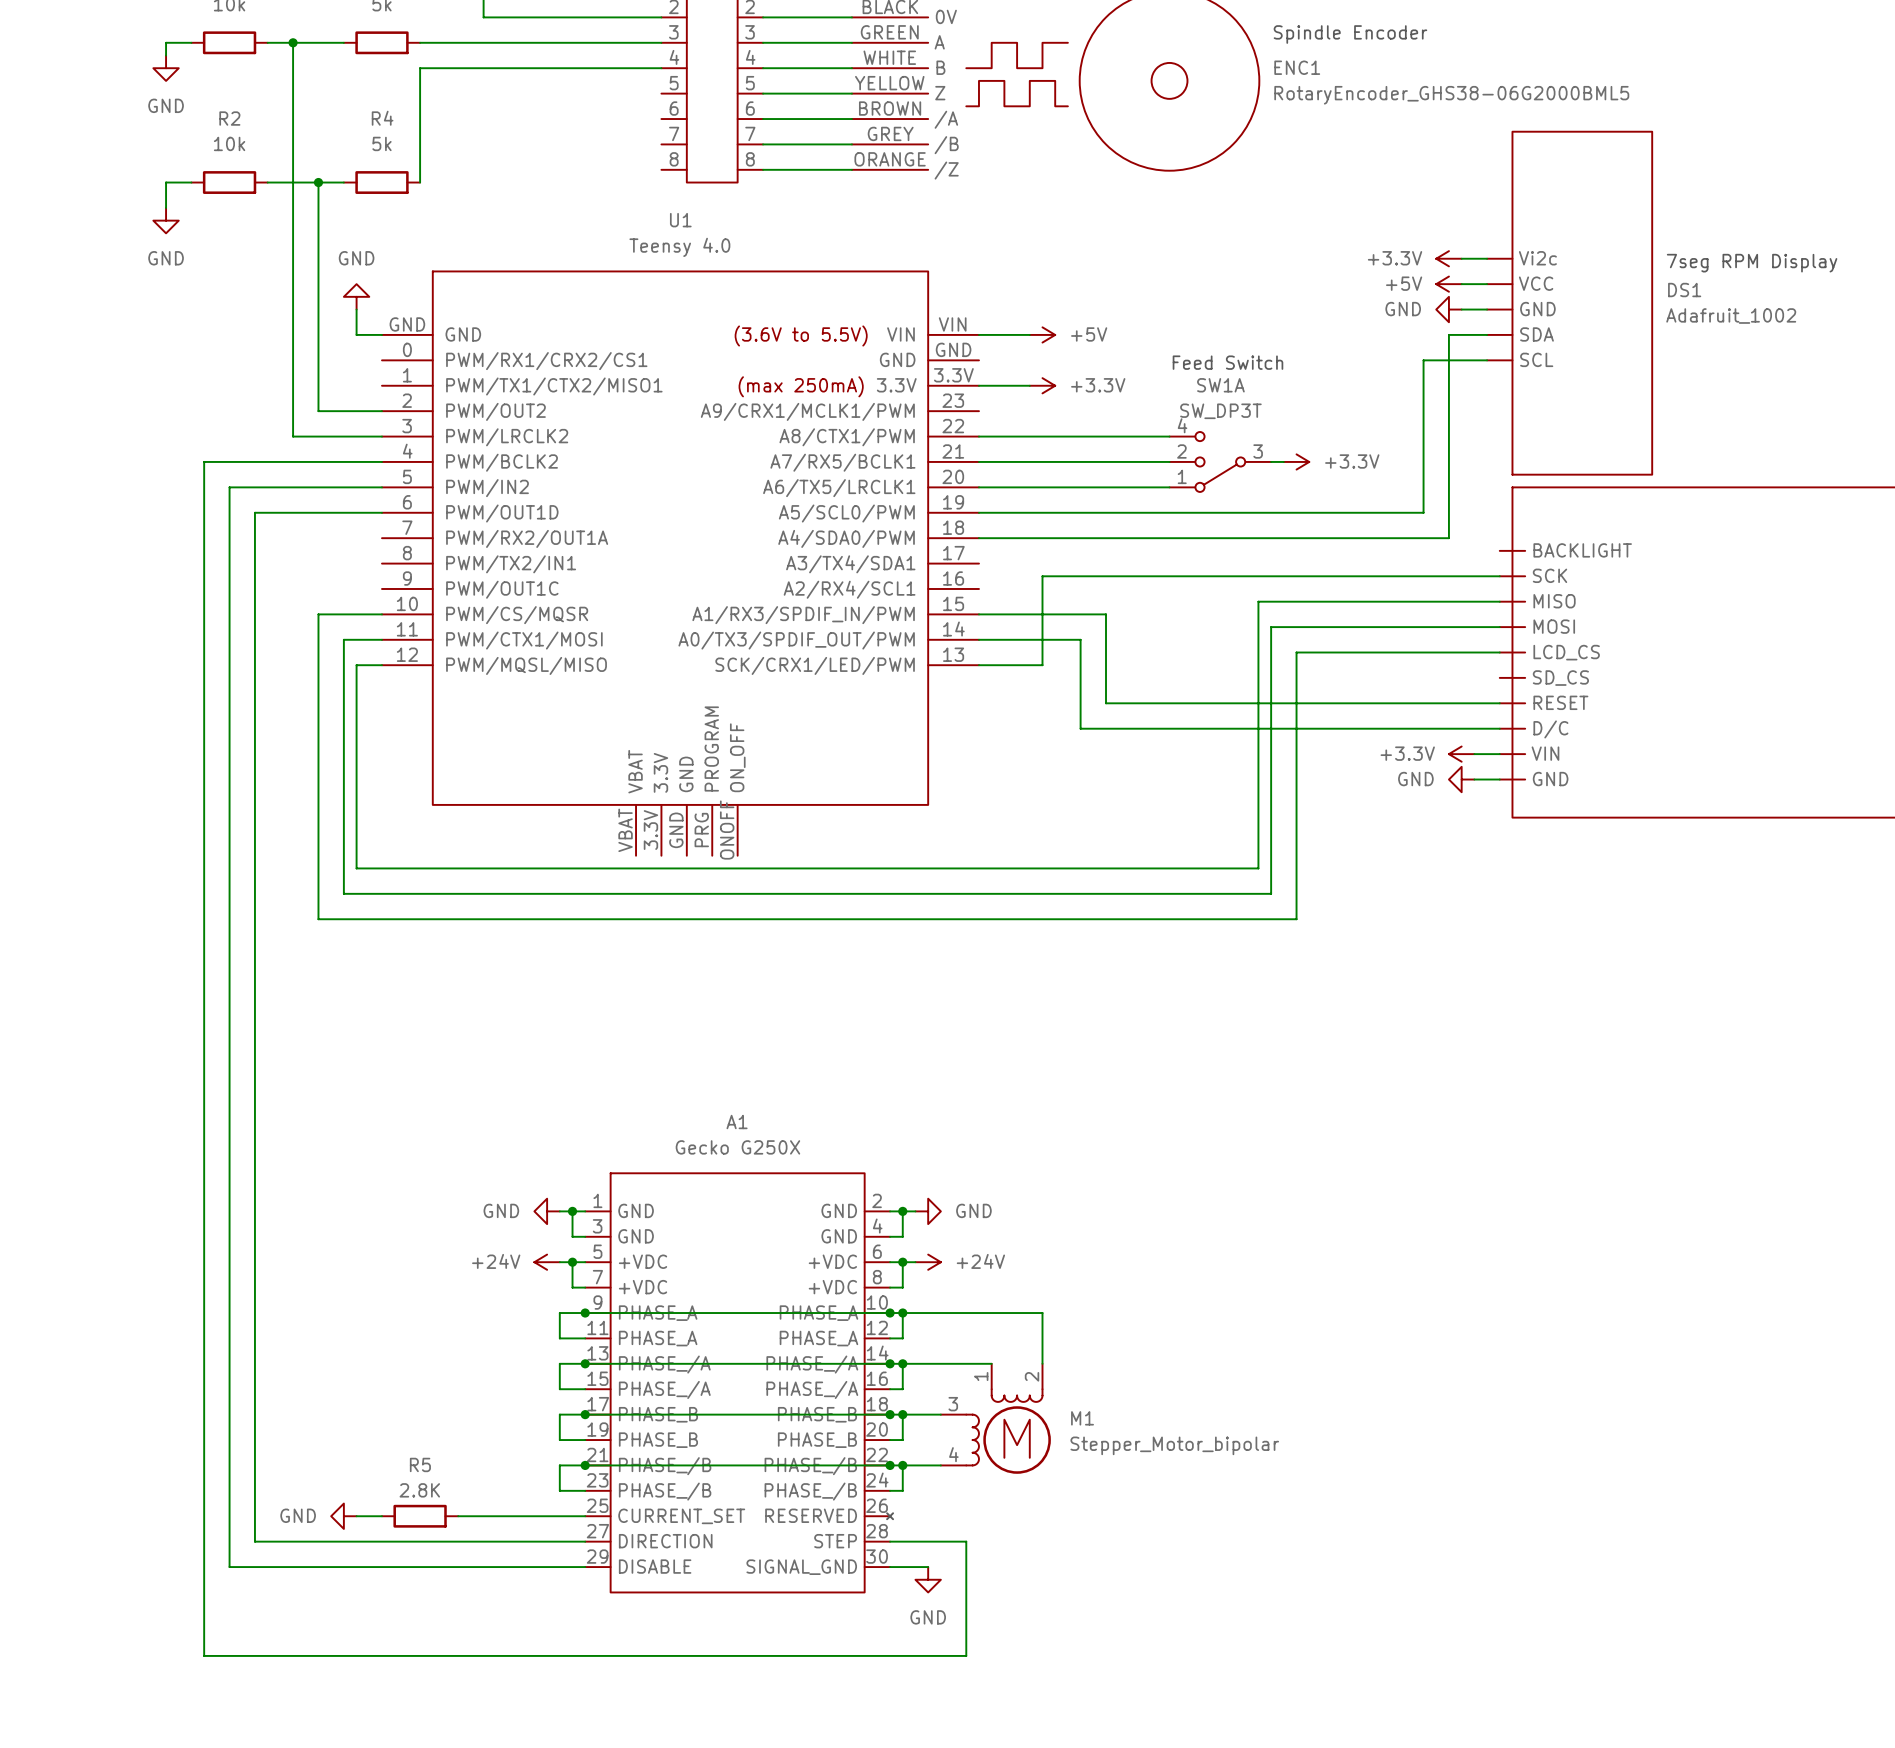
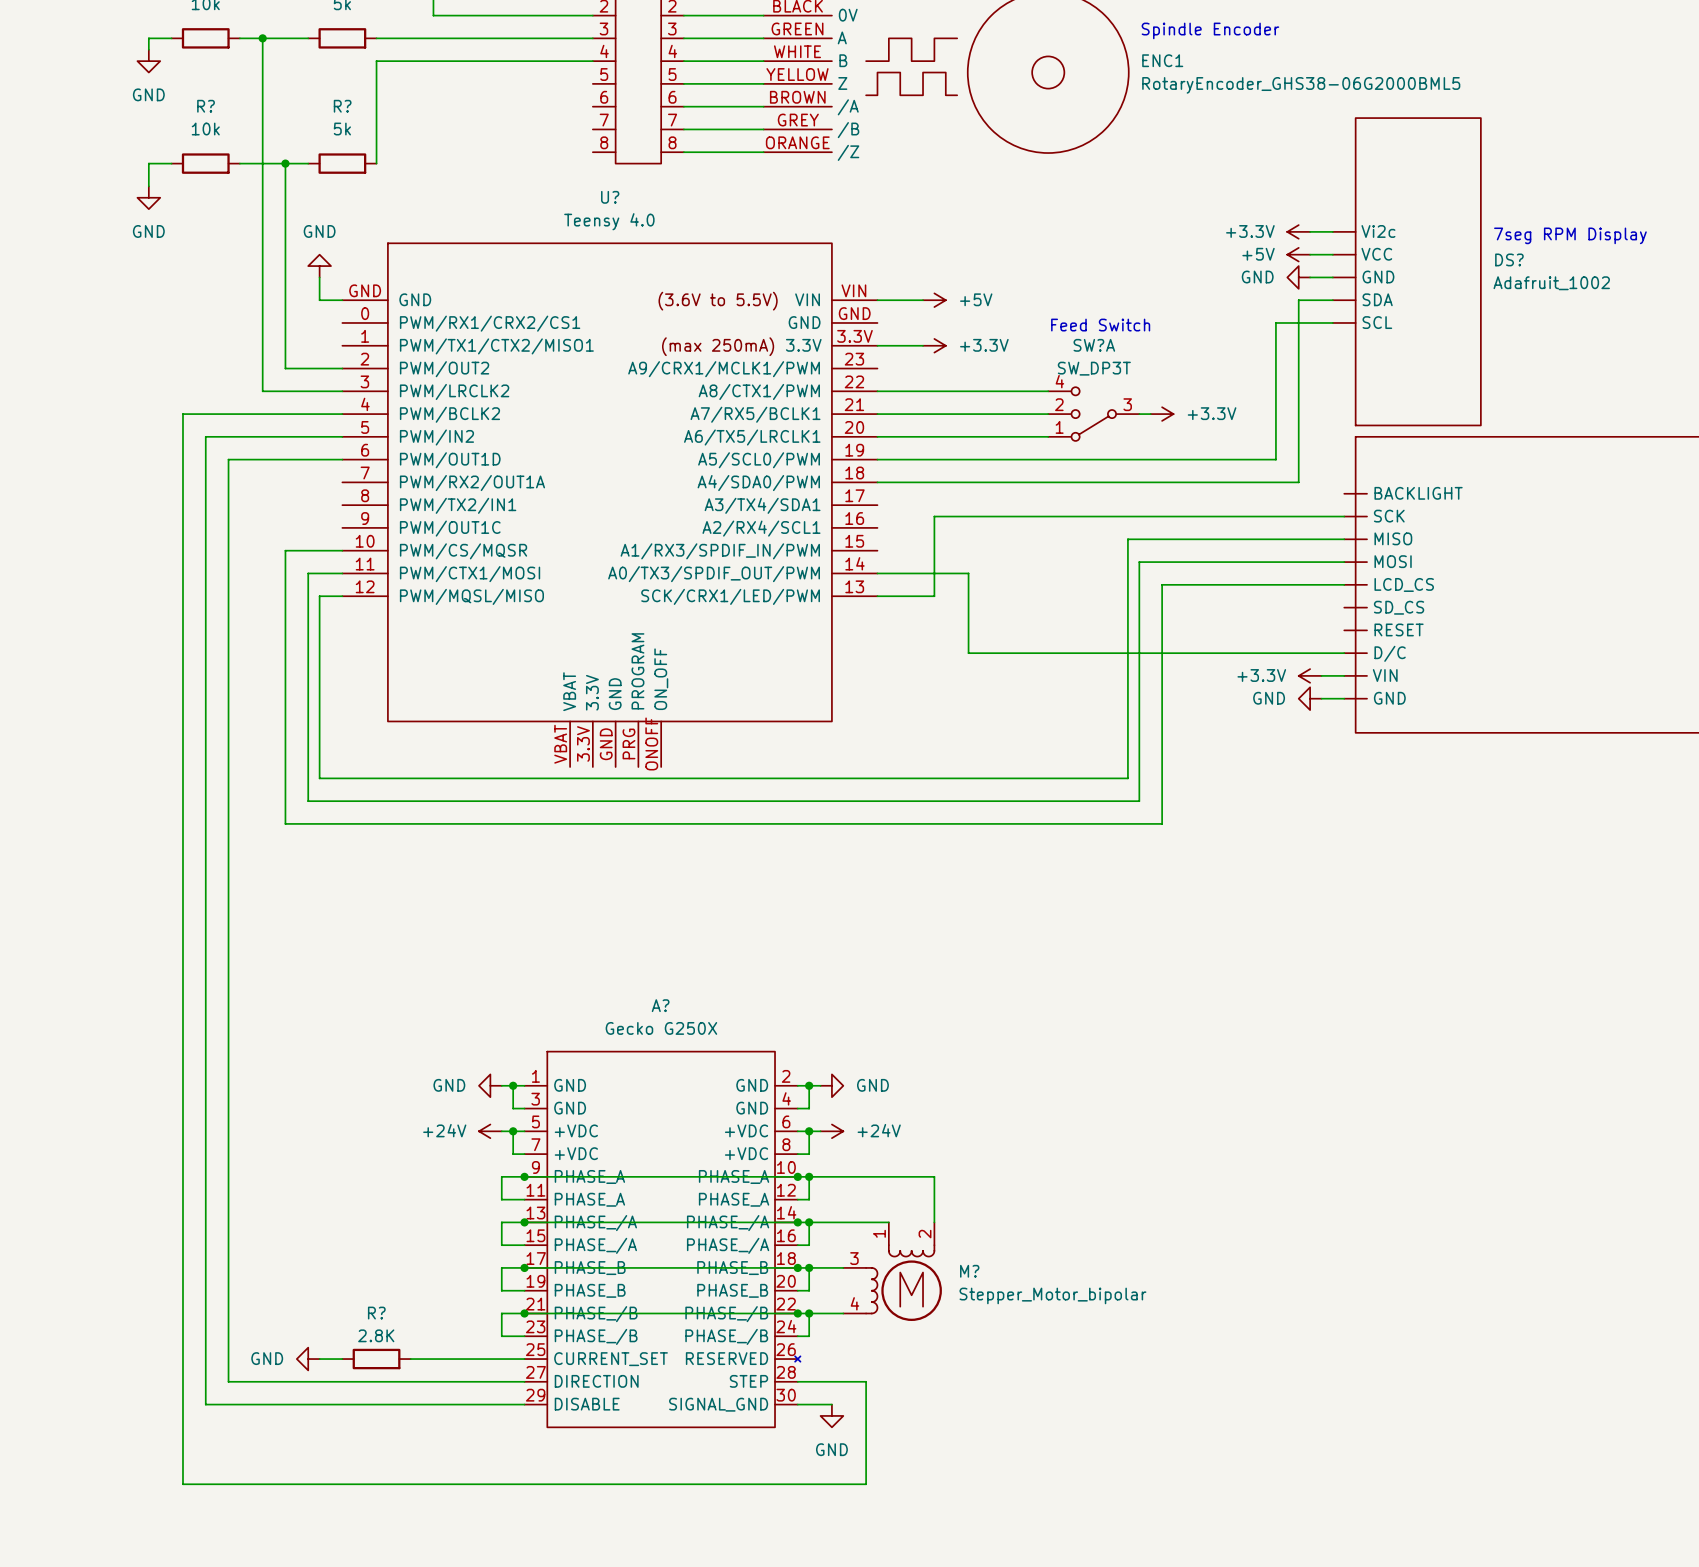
R2 name: R2 (229, 118) -> R? (206, 106)
R4 name: R4 (382, 118) -> R? (342, 106)
U1 name: U1 (680, 220) -> U? (610, 197)
DS1 name: DS1 (1684, 290) -> DS? (1509, 259)
SW1A name: SW1A (1220, 385) -> SW?A (1094, 345)
wire: (978, 614) (1106, 614) (1106, 703) (1499, 703) -> none
A1 name: A1 (737, 1122) -> A? (660, 1005)
M1 name: M1 (1082, 1418) -> M? (969, 1271)
R5 name: R5 (420, 1464) -> R? (376, 1313)

